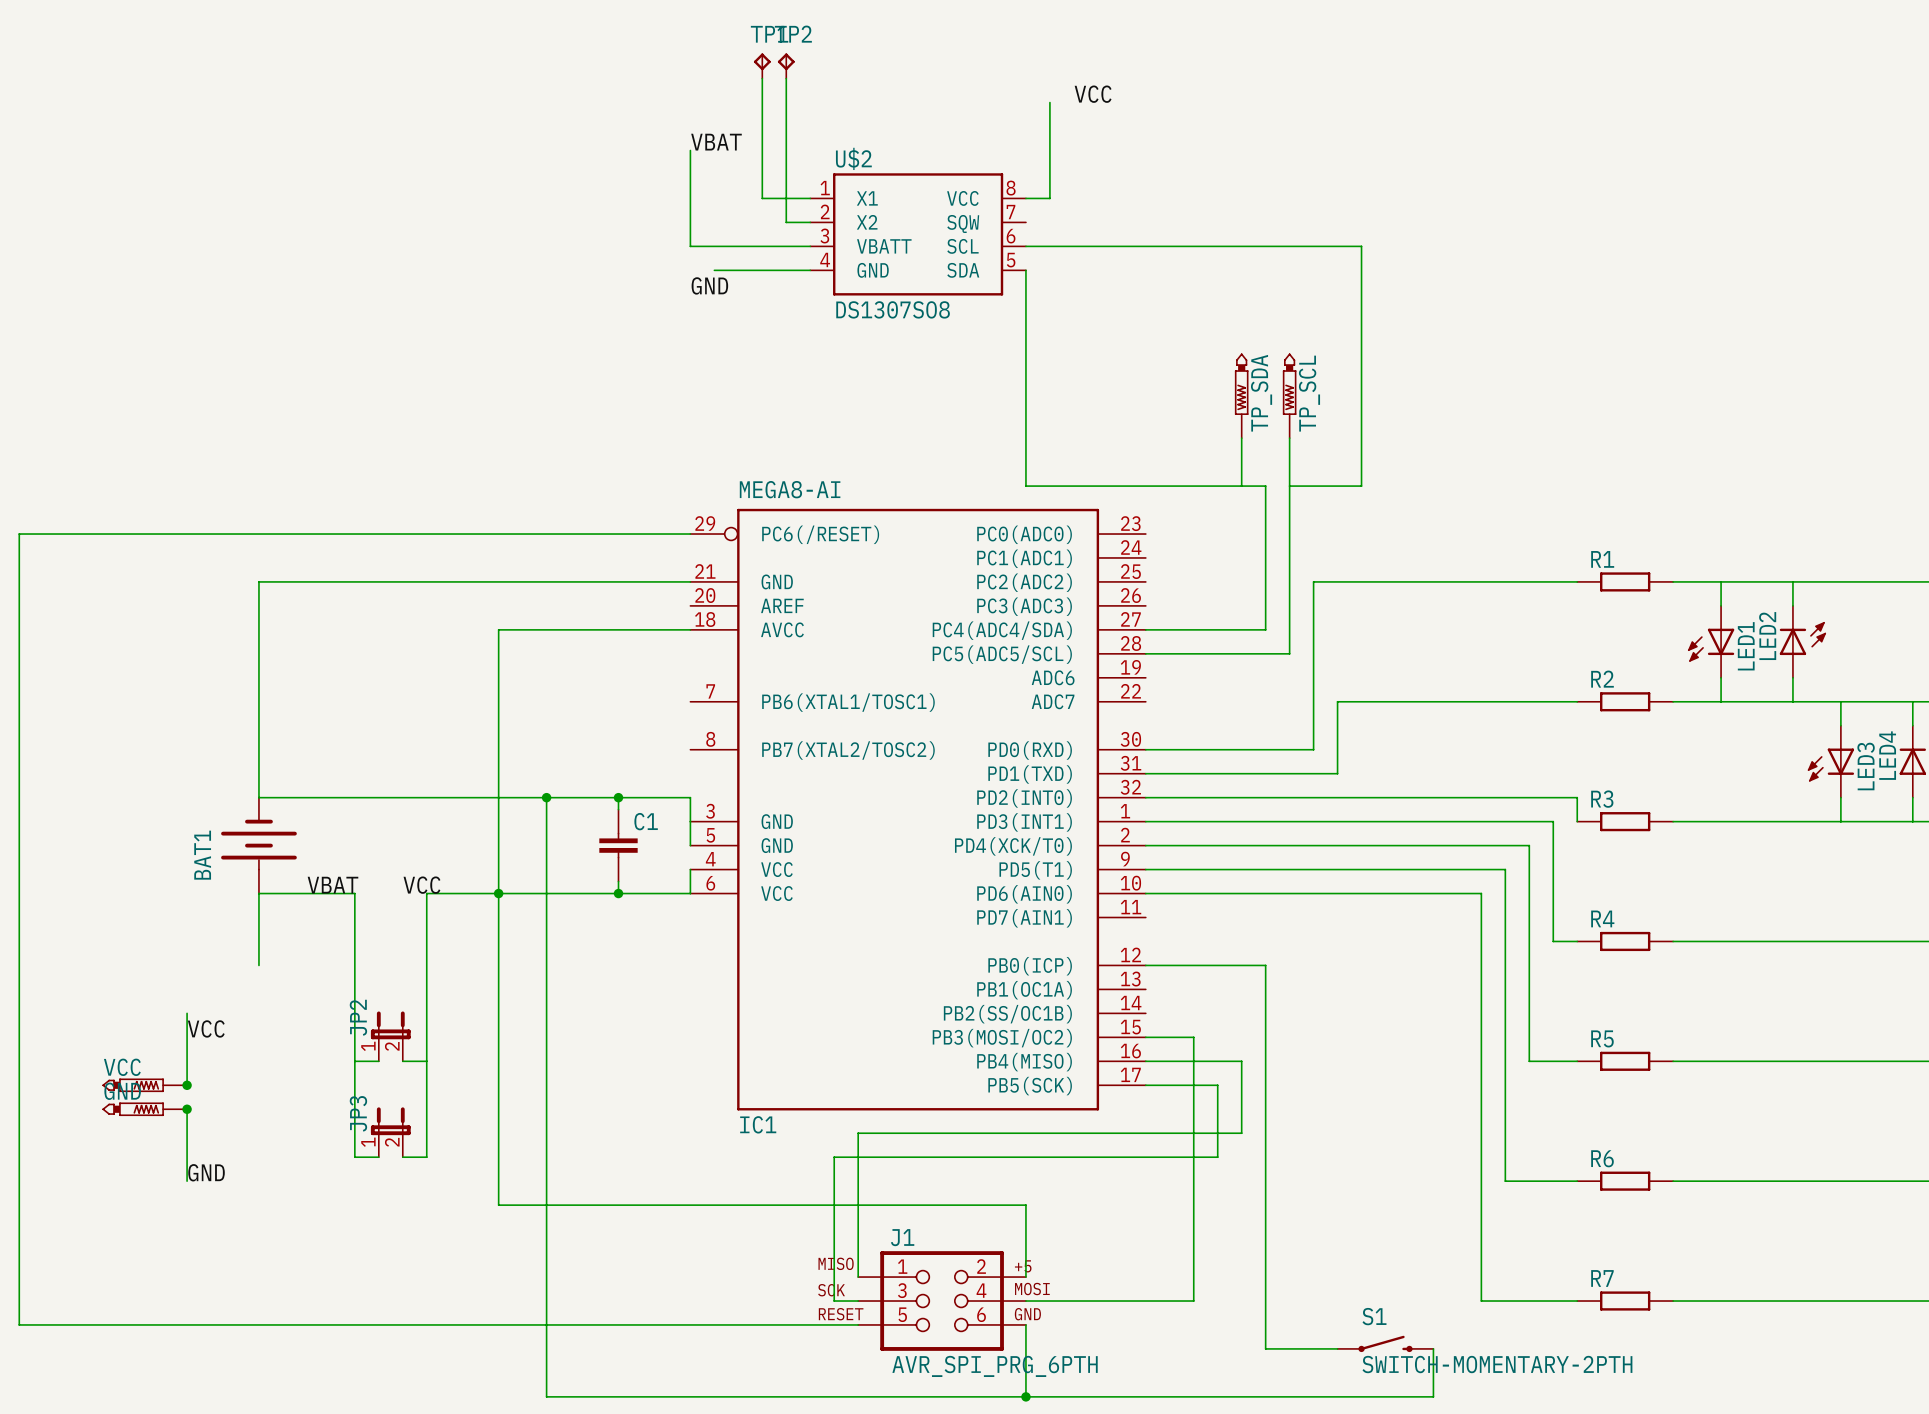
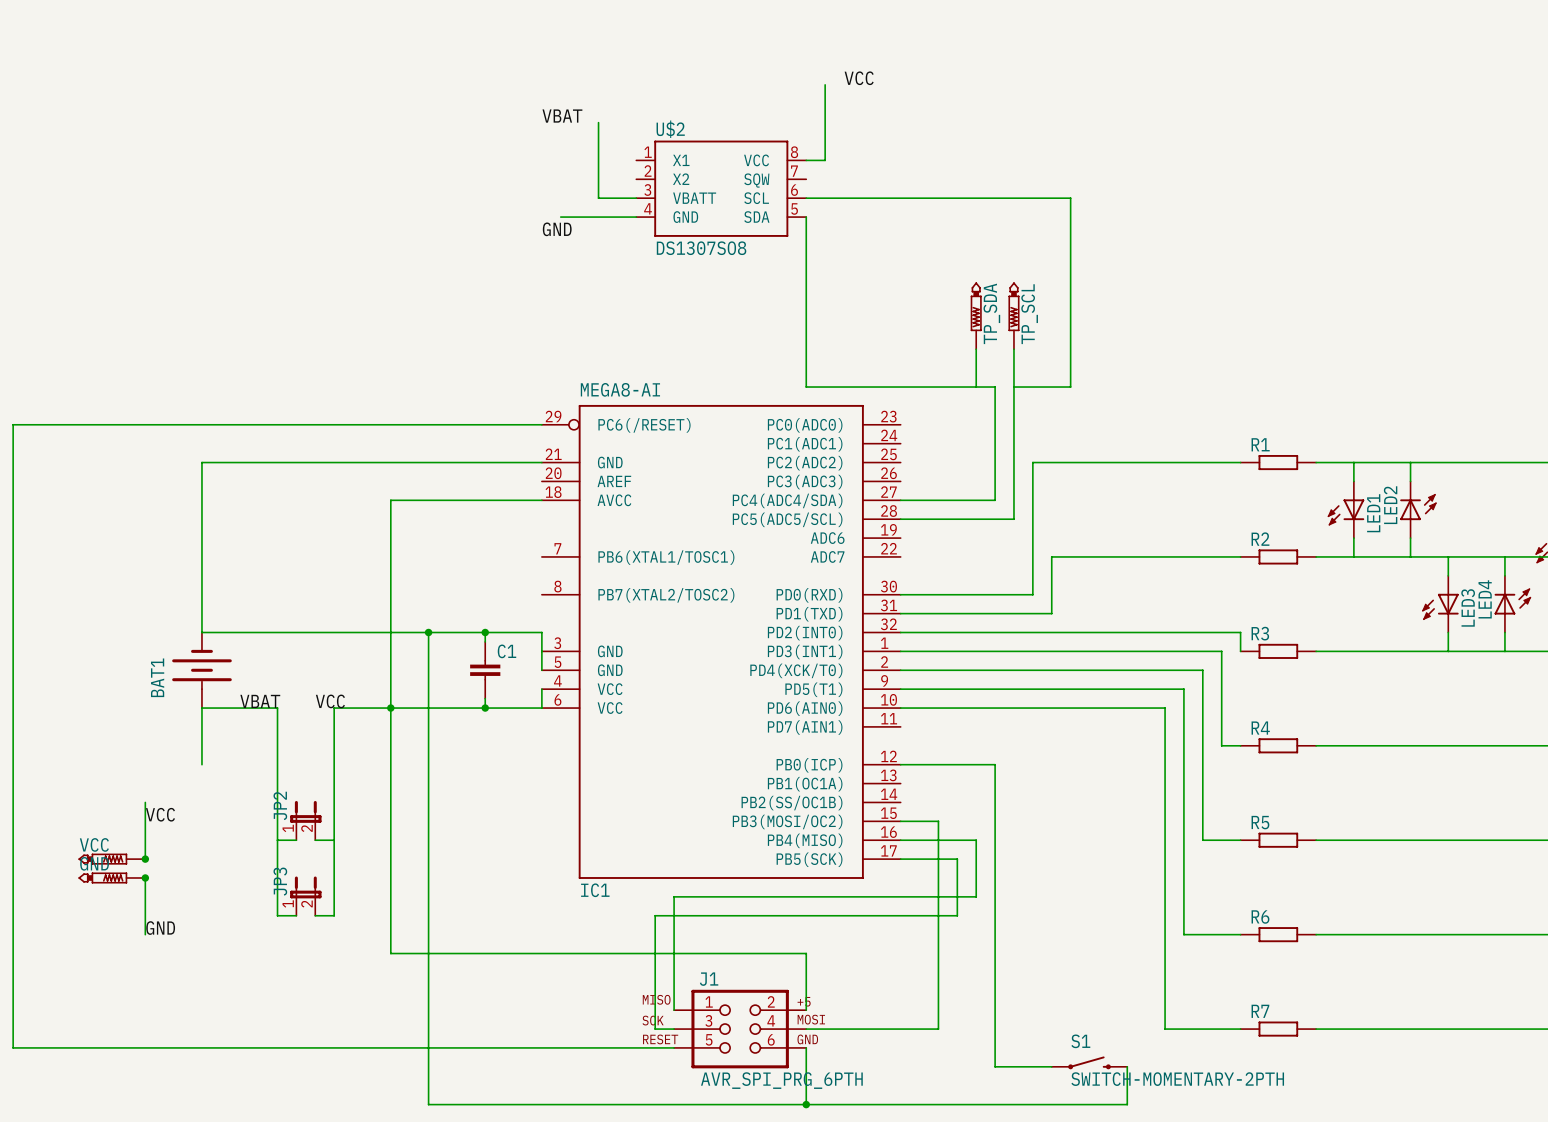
TP1: (762, 66) -> none
TP2: (786, 66) -> none
wire: (762, 78) (762, 150) -> none
wire: (786, 78) (786, 222) (810, 222) -> none
wire: (690, 150) (690, 246) (762, 246) -> none
wire: (762, 198) (810, 198) -> (598, 160) (598, 198)

